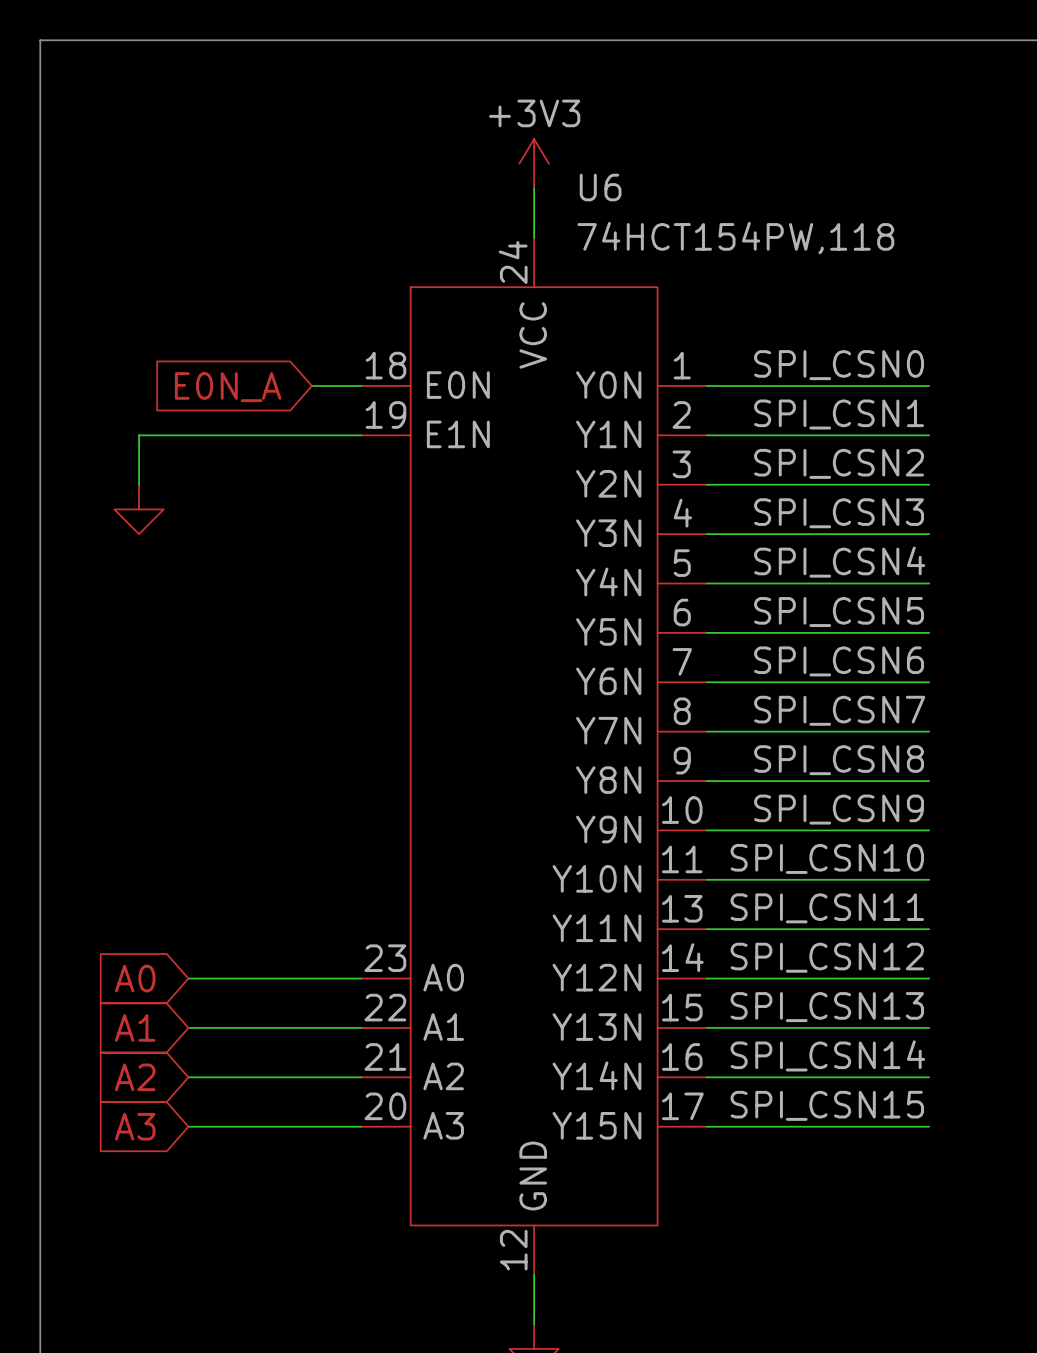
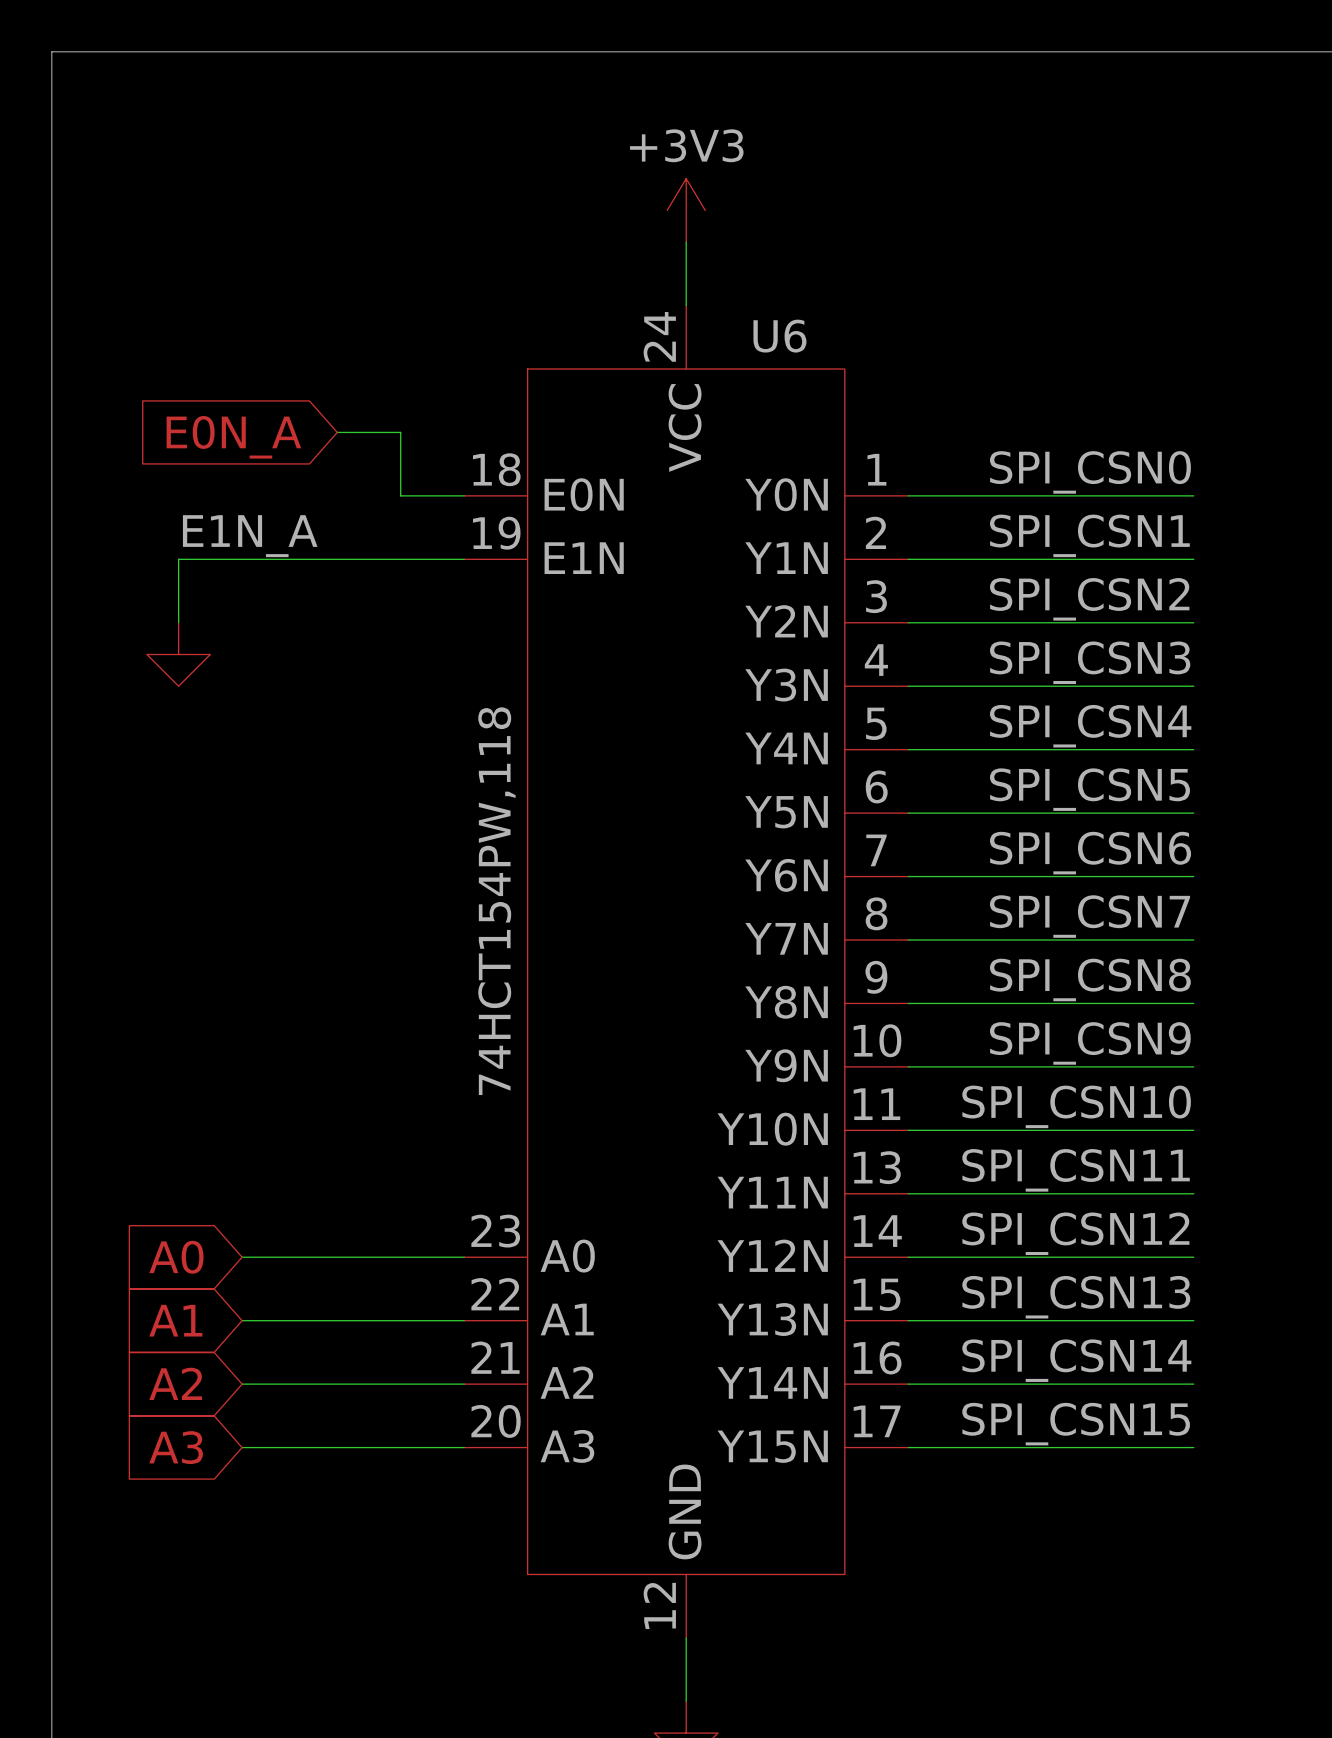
U6 name position: U6 (600, 187) -> U6 (779, 336)
U6 value rotation: 0° (735, 238) -> 90° counterclockwise (496, 901)
U6 value position: 74HCT154PW,118 (735, 238) -> 74HCT154PW,118 (496, 901)
wire: none -> (337, 432) (400, 432) (400, 495)
global label position: E0N_A (228, 387) -> E0N_A (233, 437)
label: none -> E1N_A (250, 536)

